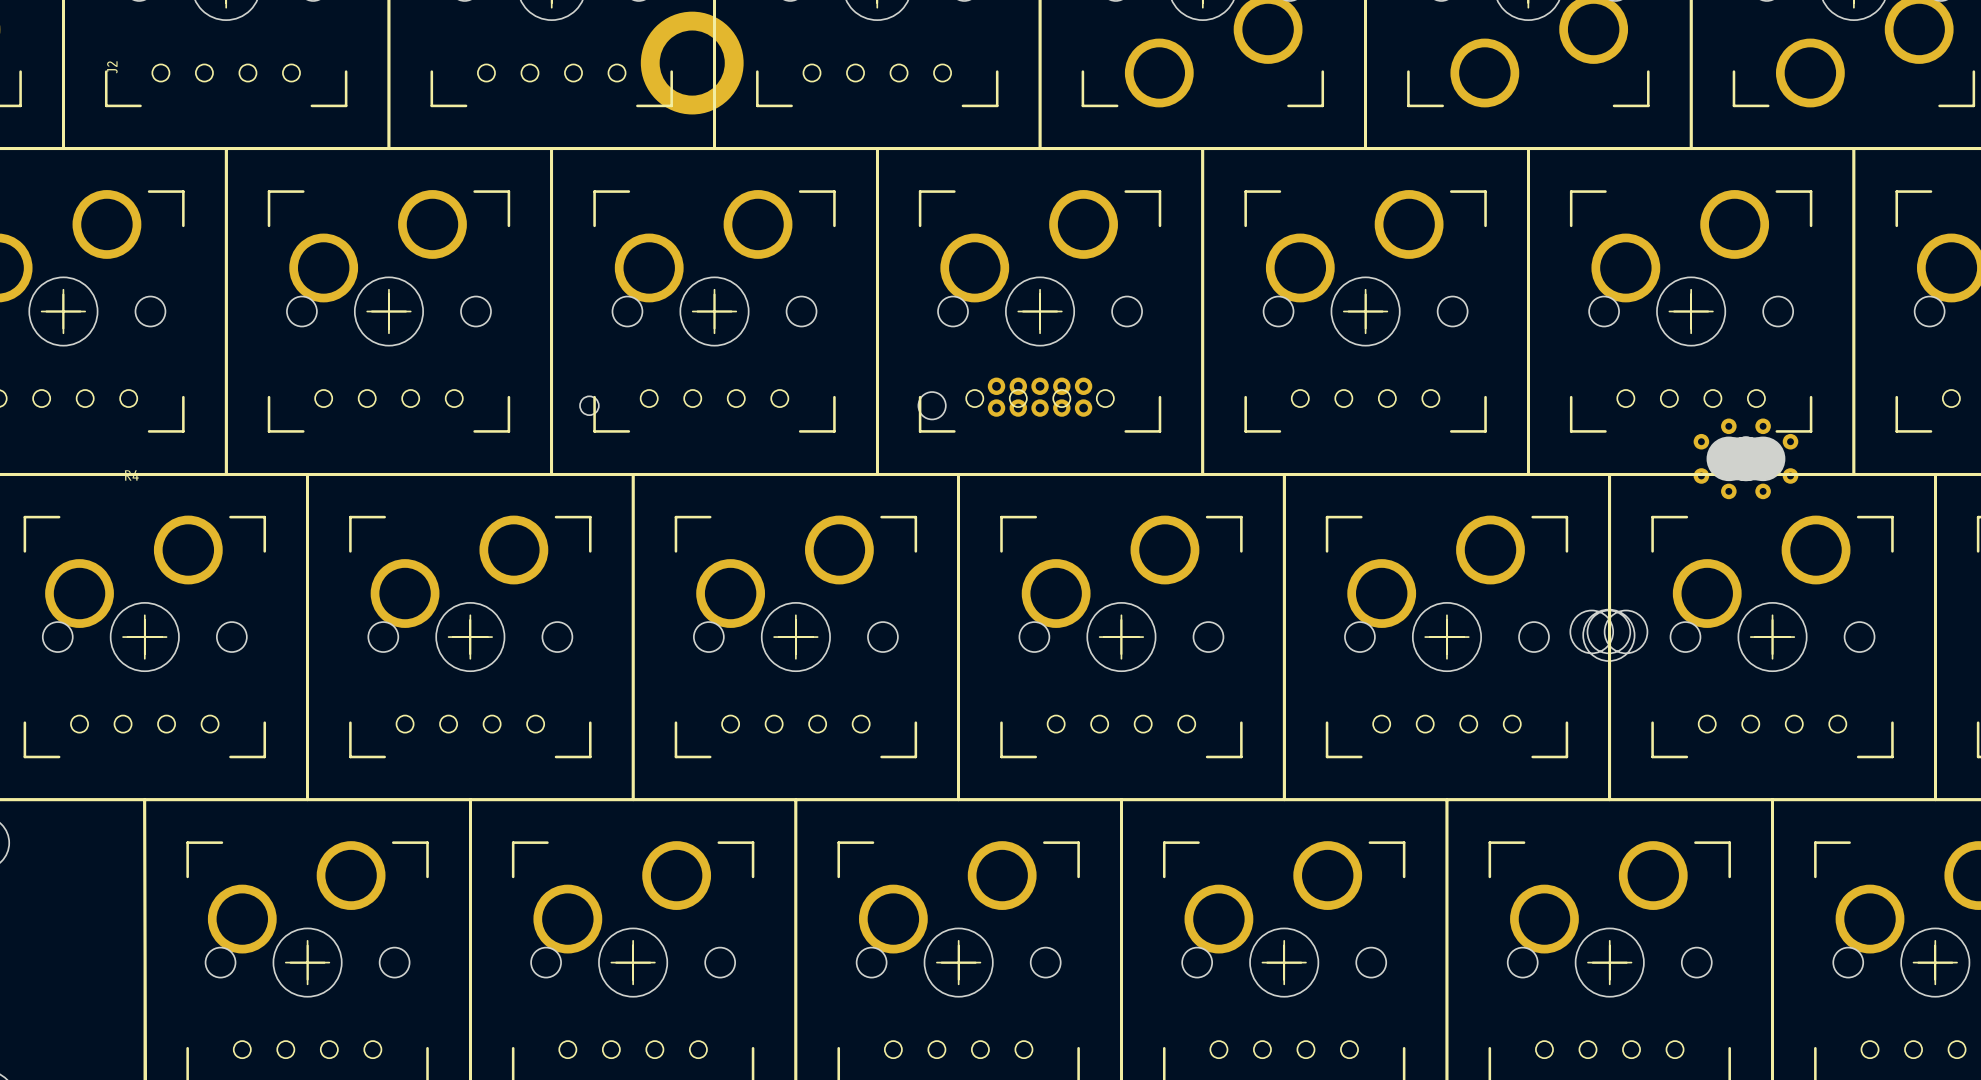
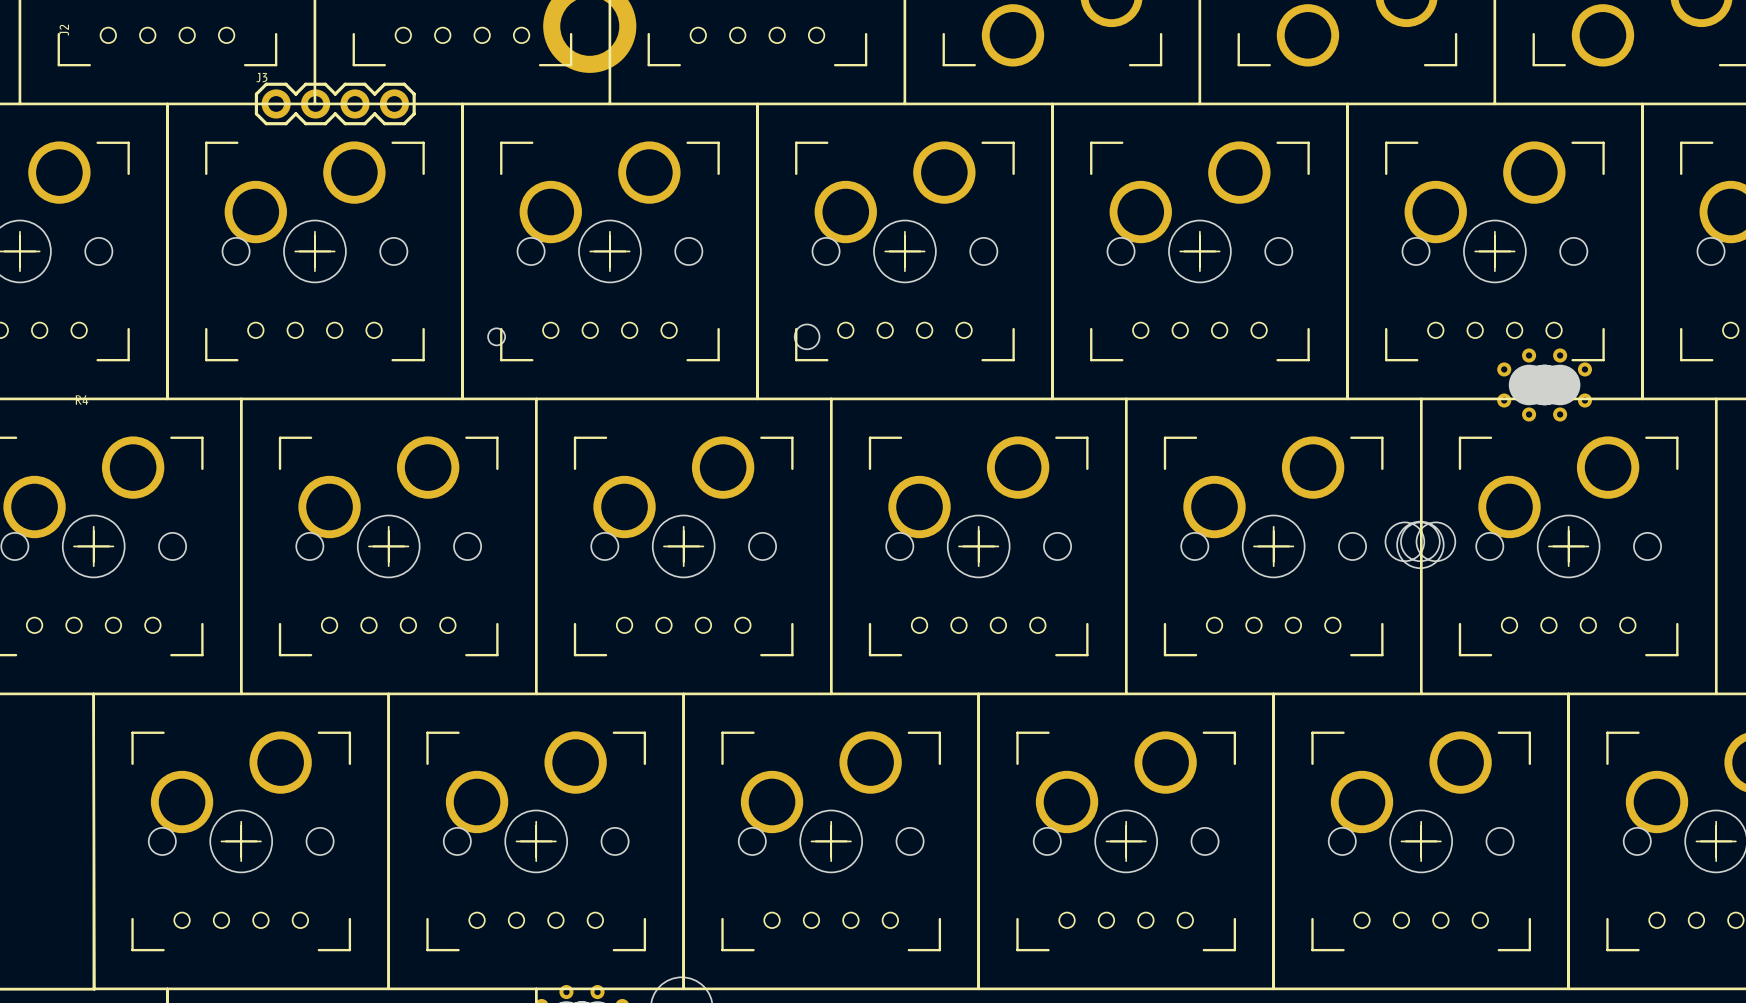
J3: none -> (335, 103)
part: (1040, 397) -> none

